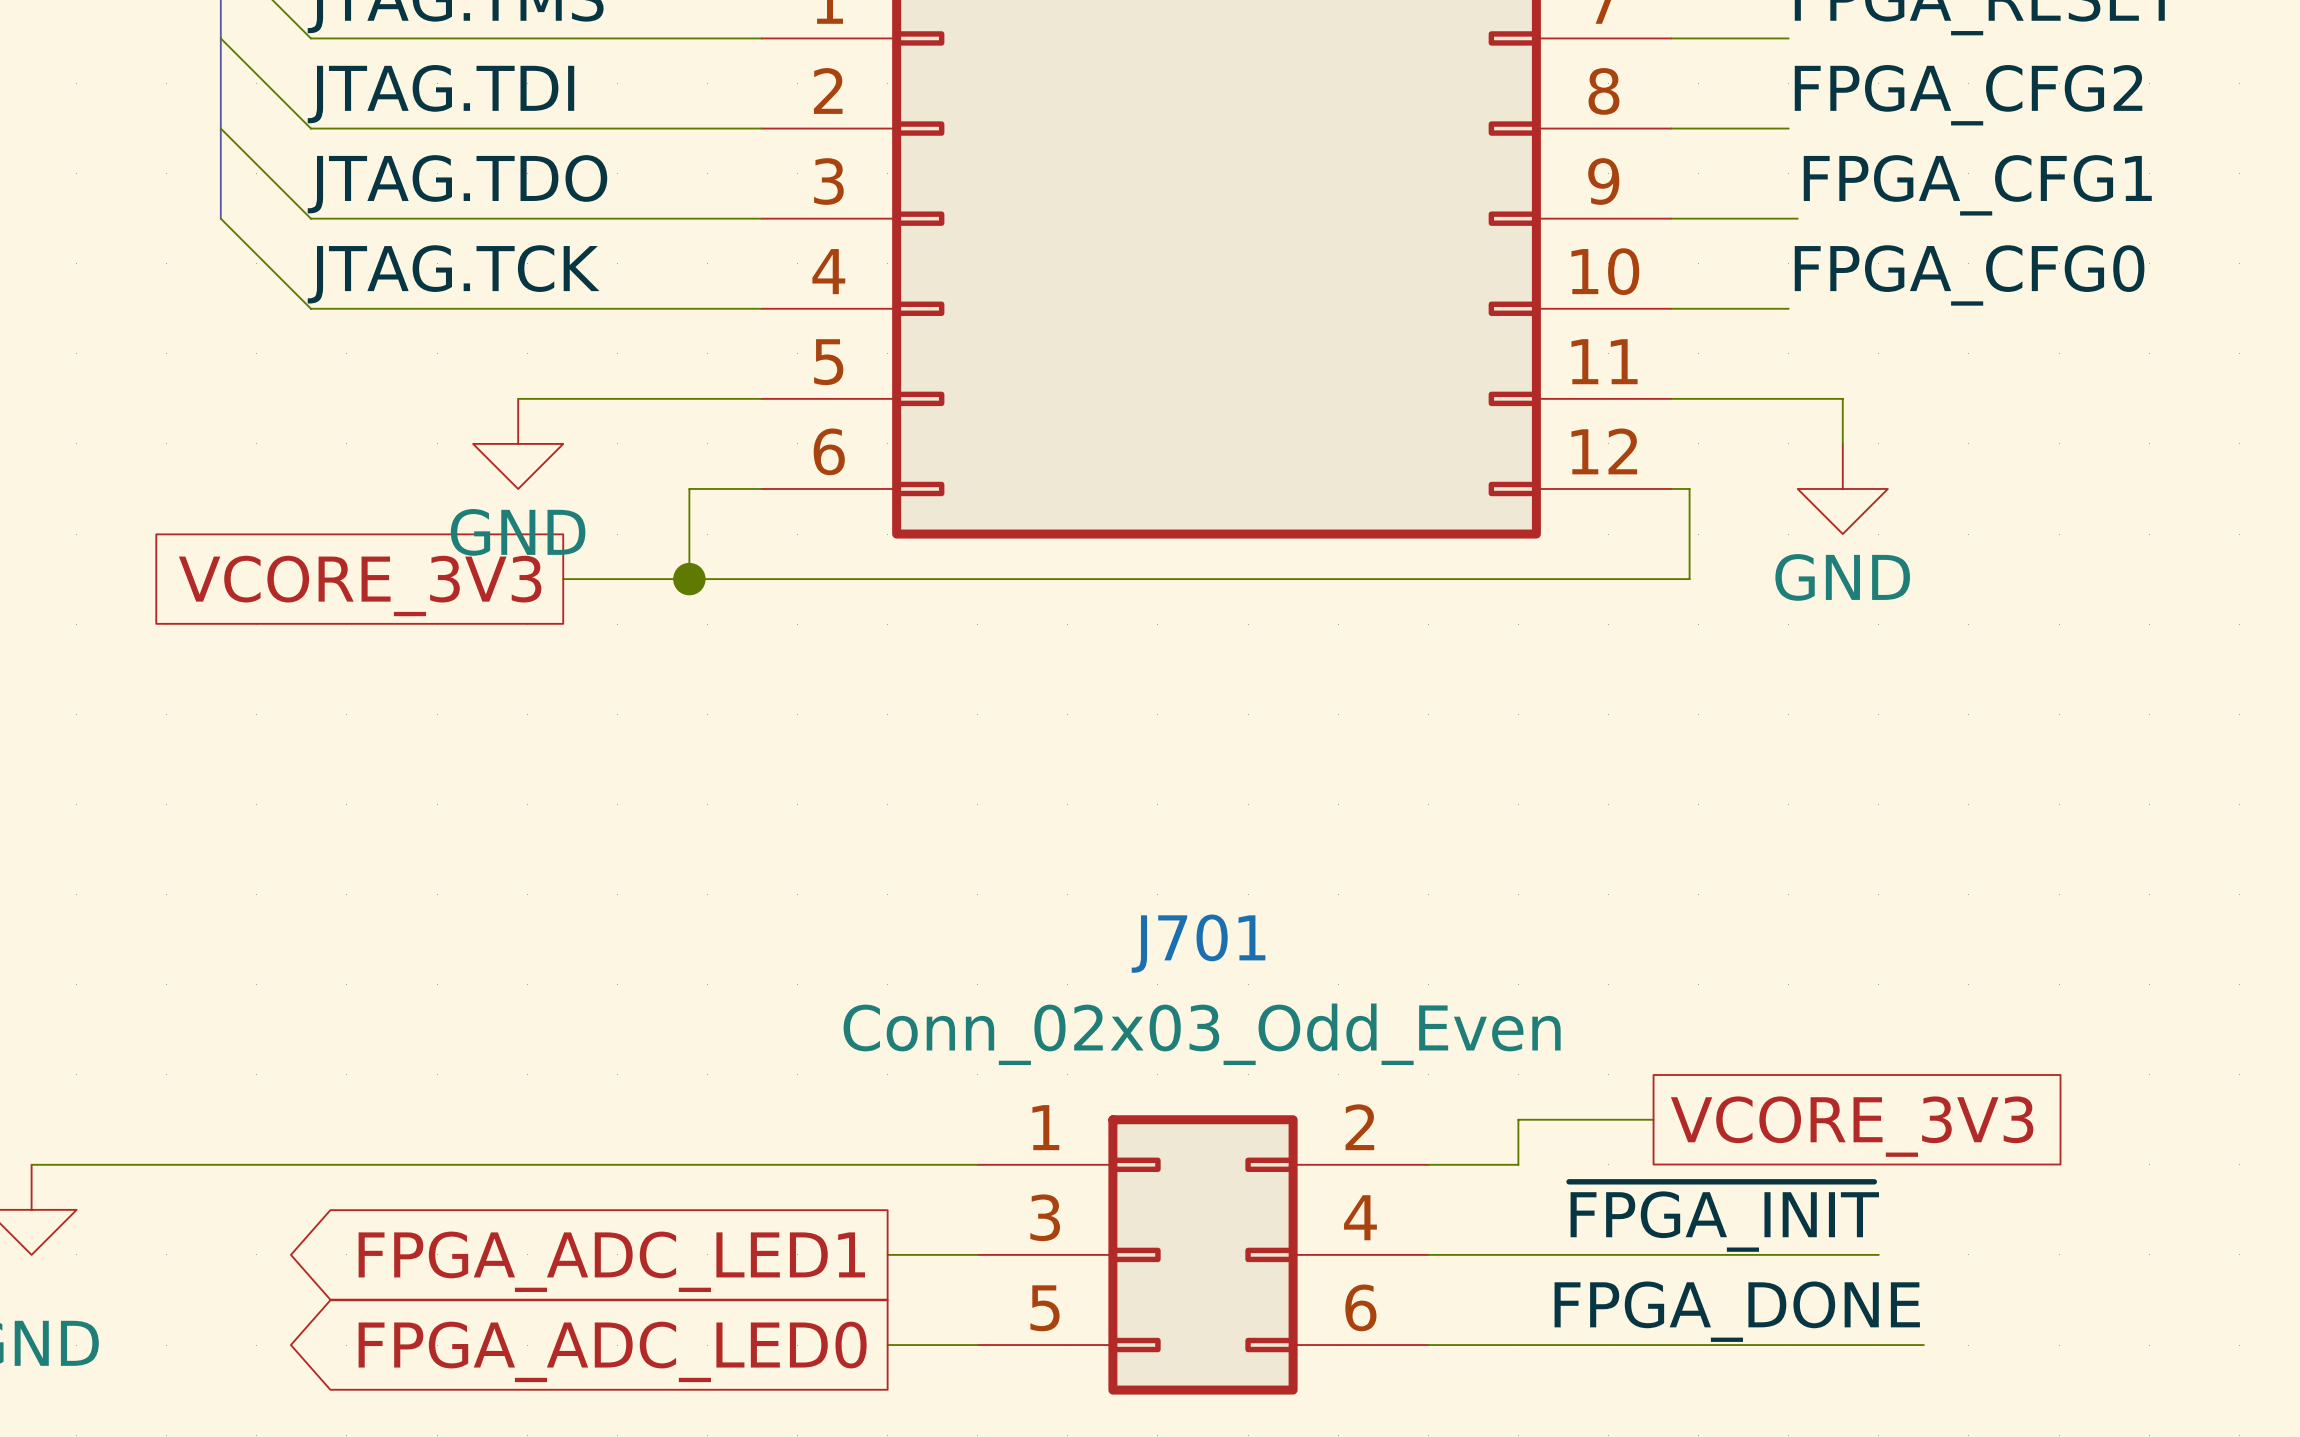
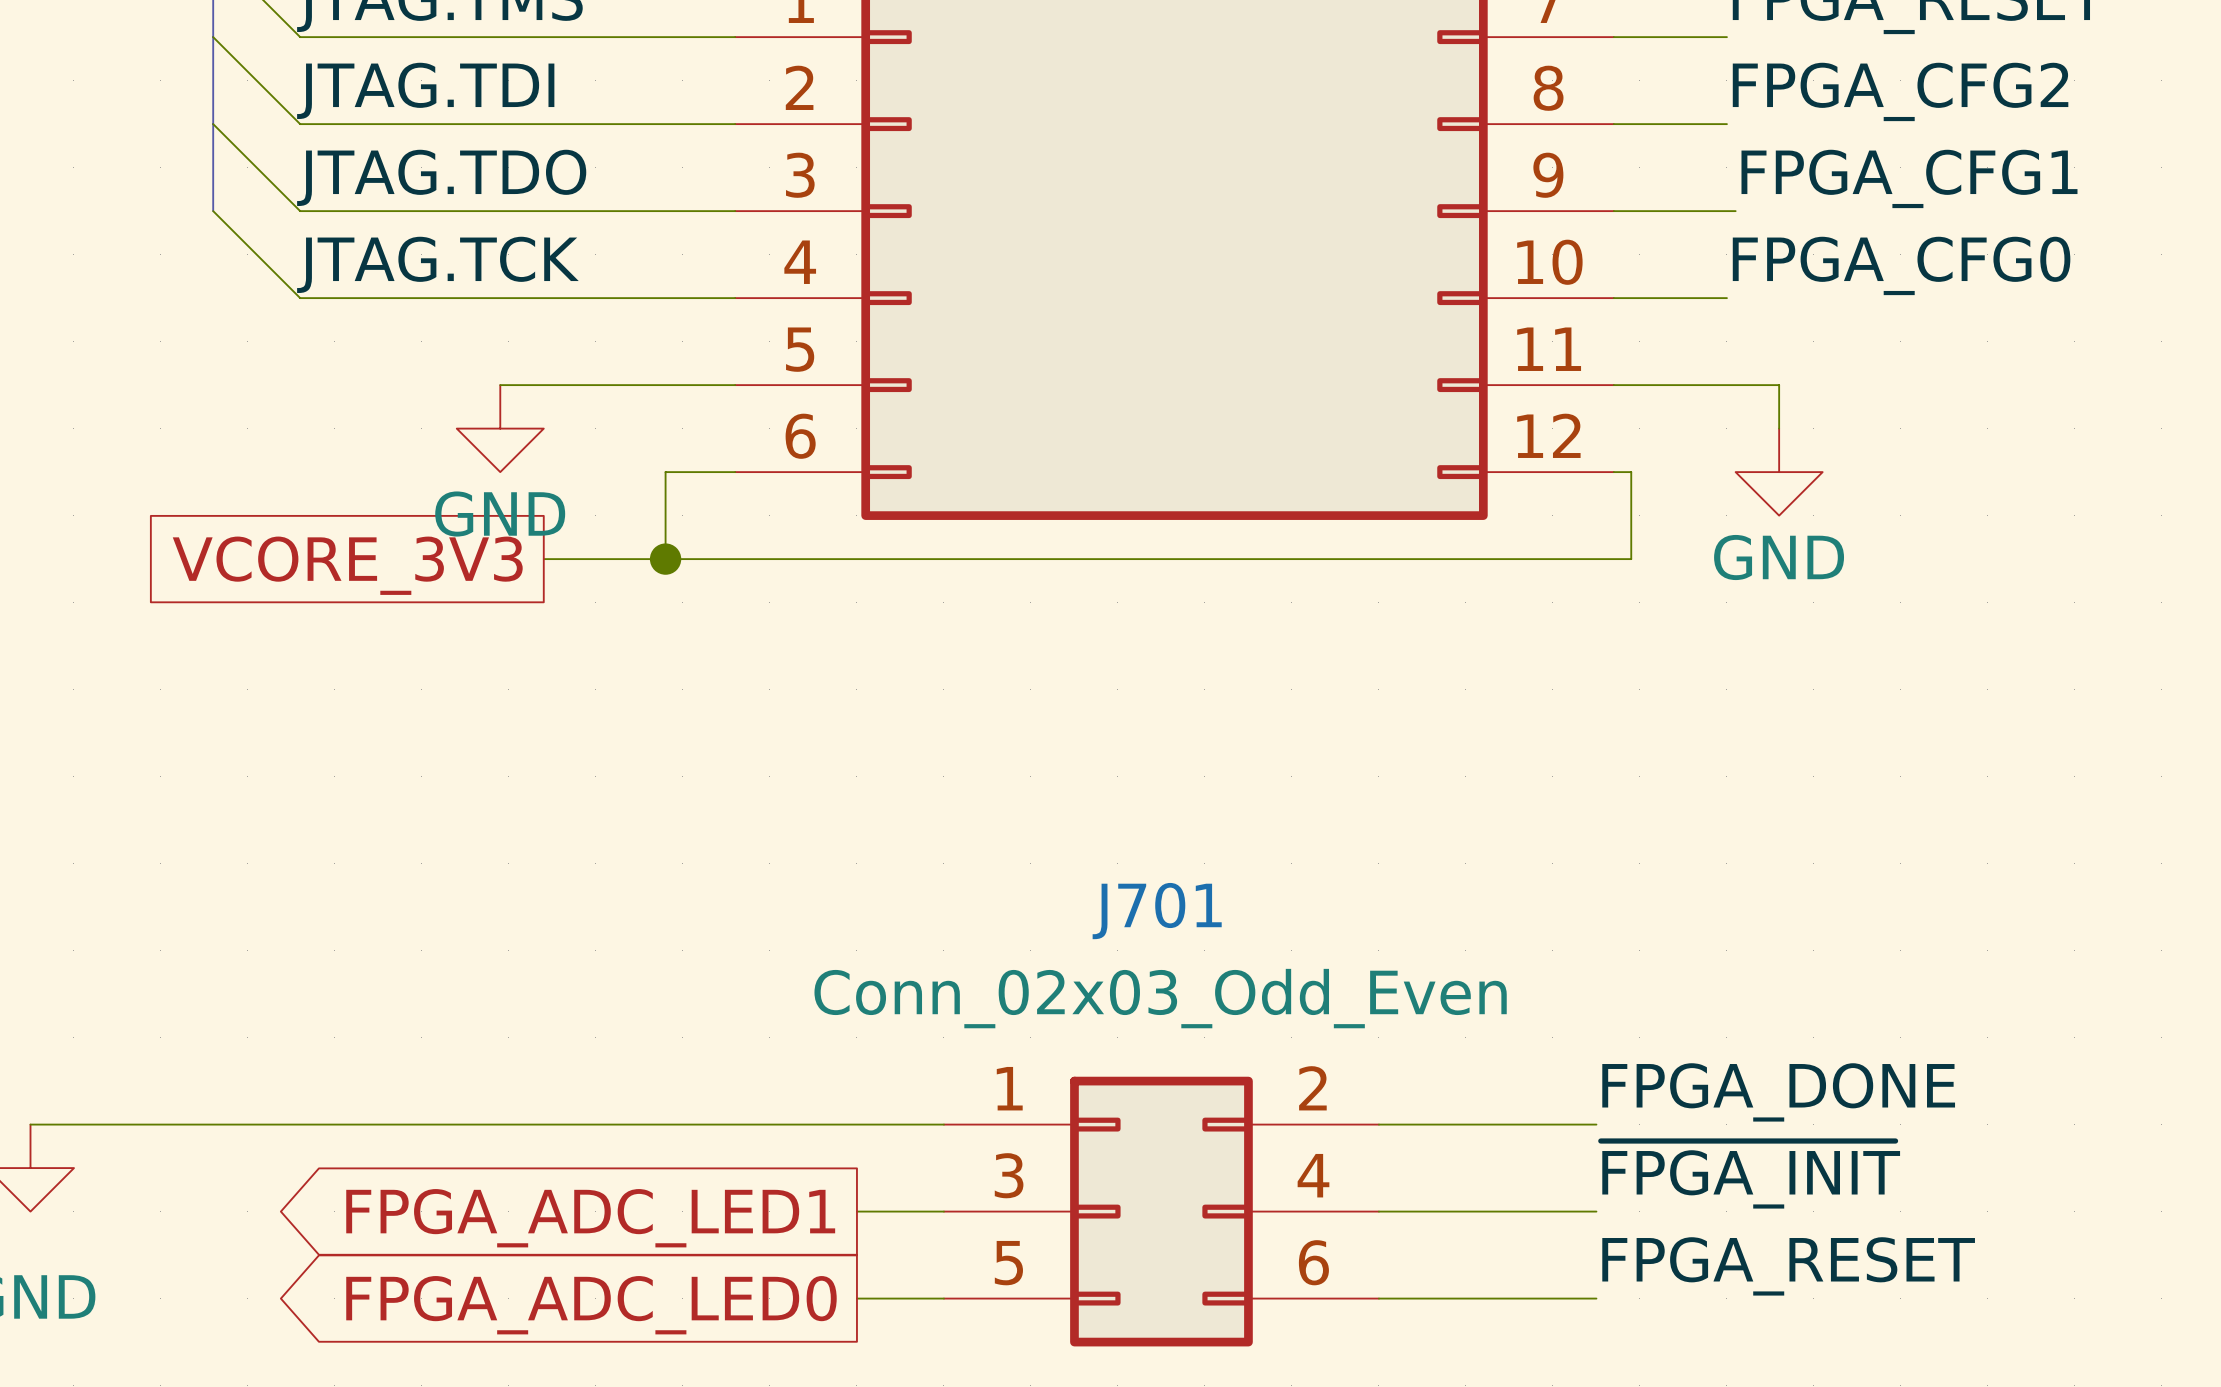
wire: (1653, 1119) (1518, 1119) (1518, 1164) -> (1596, 1124) (1465, 1124)
global label: VCORE_3V3 (1852, 1126) -> none
label position: ~{FPGA_INIT} (1724, 1216) -> ~{FPGA_INIT} (1750, 1174)
wire: (1653, 1254) (1878, 1254) -> none
label position: FPGA_DONE (1737, 1311) -> FPGA_DONE (1778, 1092)
label: none -> FPGA_RESET (1788, 1266)
wire: (1653, 1345) (1923, 1345) -> none

